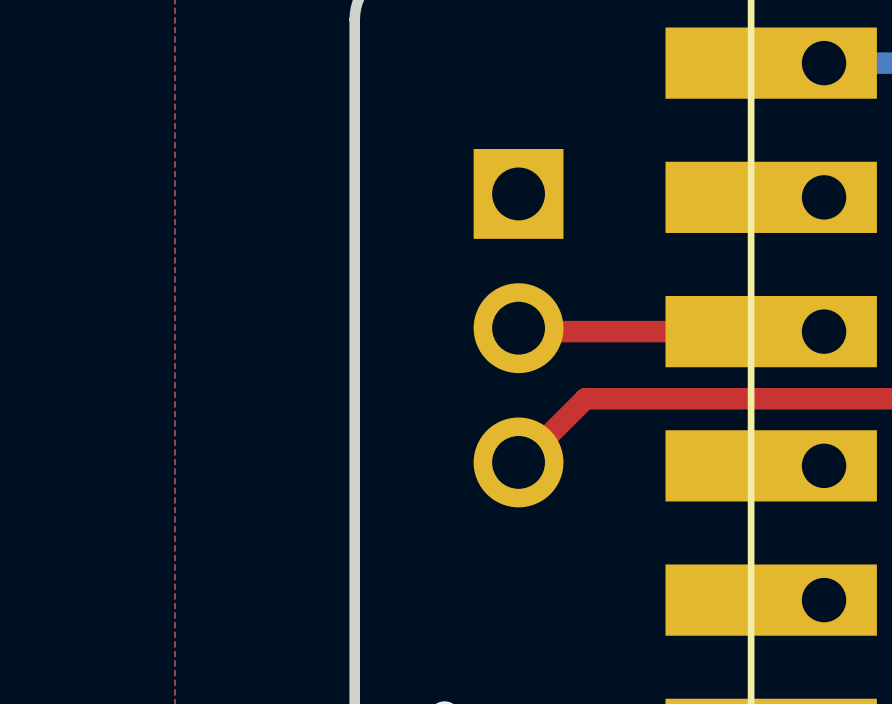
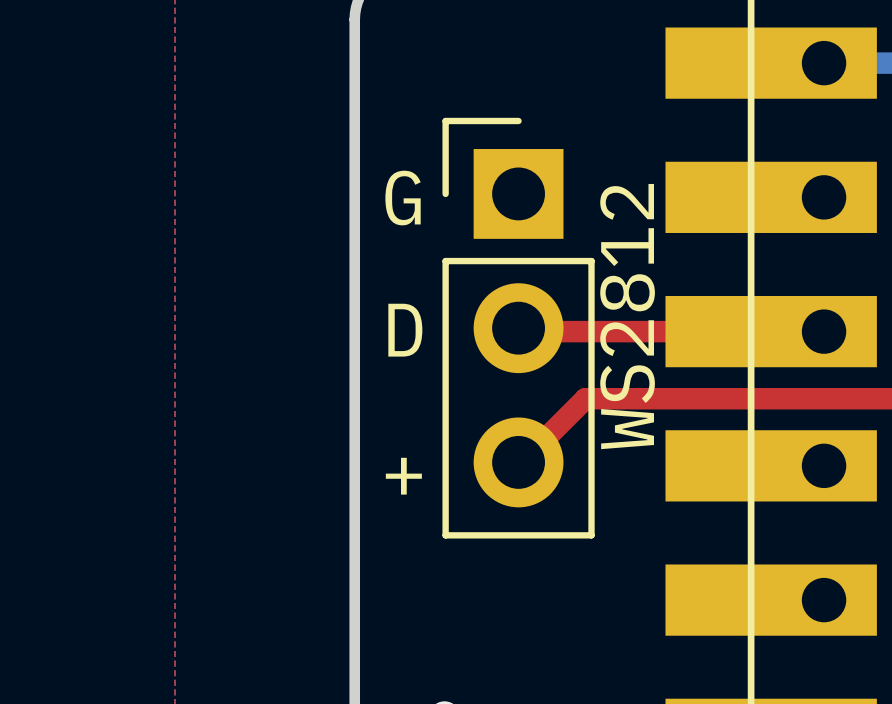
text: none -> G (403, 198)
WS2812 side: bottom (518, 328) -> top (518, 328)
text: none -> D (405, 330)
text: none -> + (403, 476)

